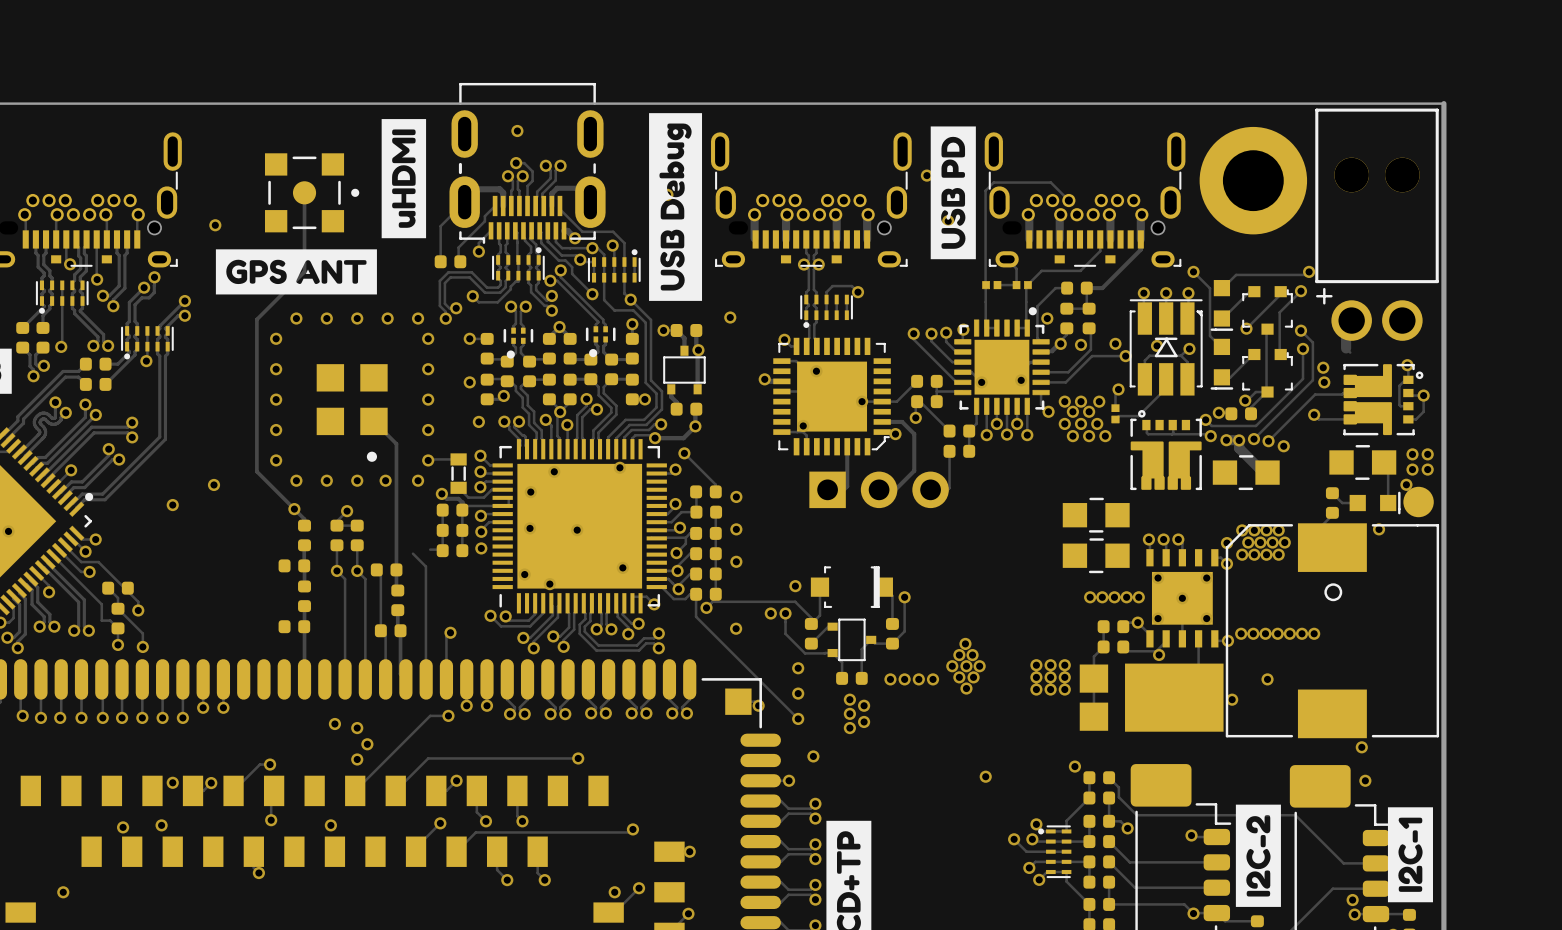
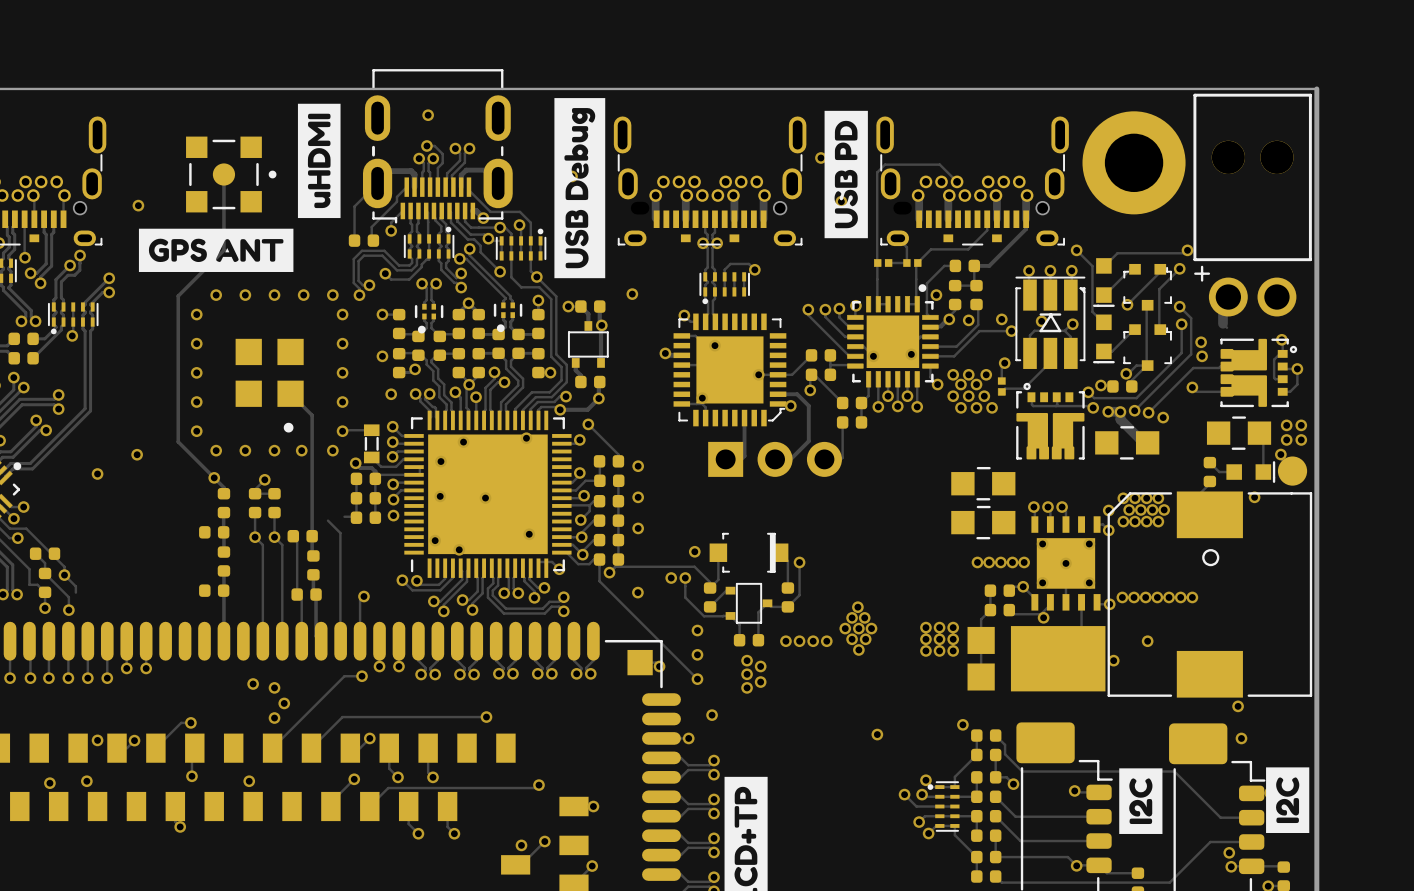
track: none -> (64, 575) (75, 586) (75, 592)
drawing shape: [1235, 804, 1281, 907] -> [1119, 768, 1163, 834]
drawing shape: [1387, 807, 1433, 903] -> [1266, 767, 1310, 834]

